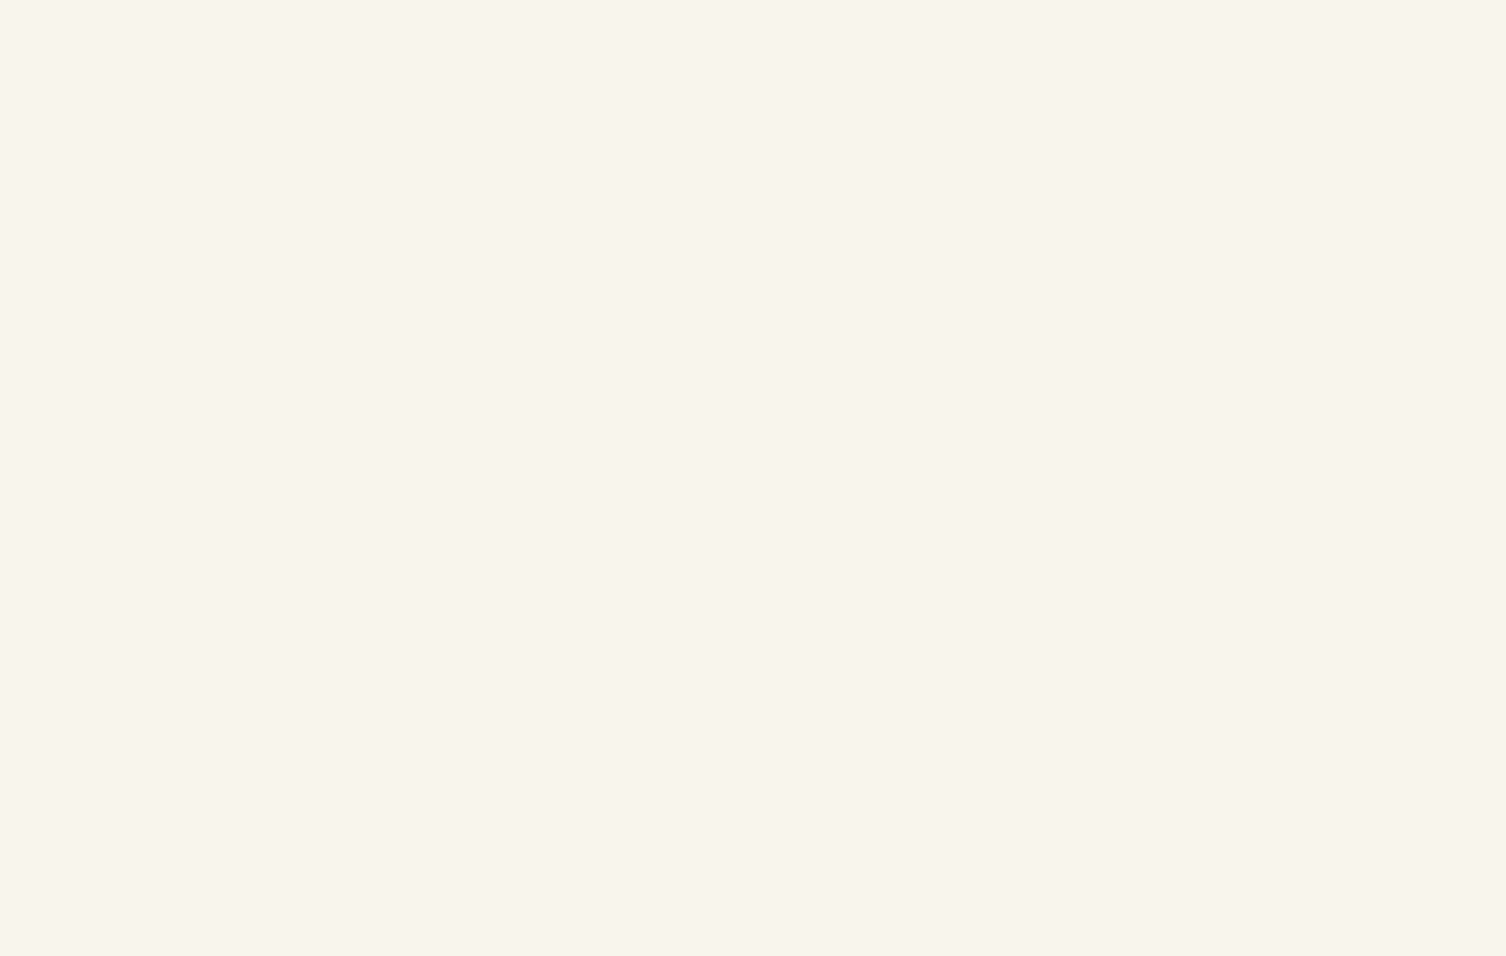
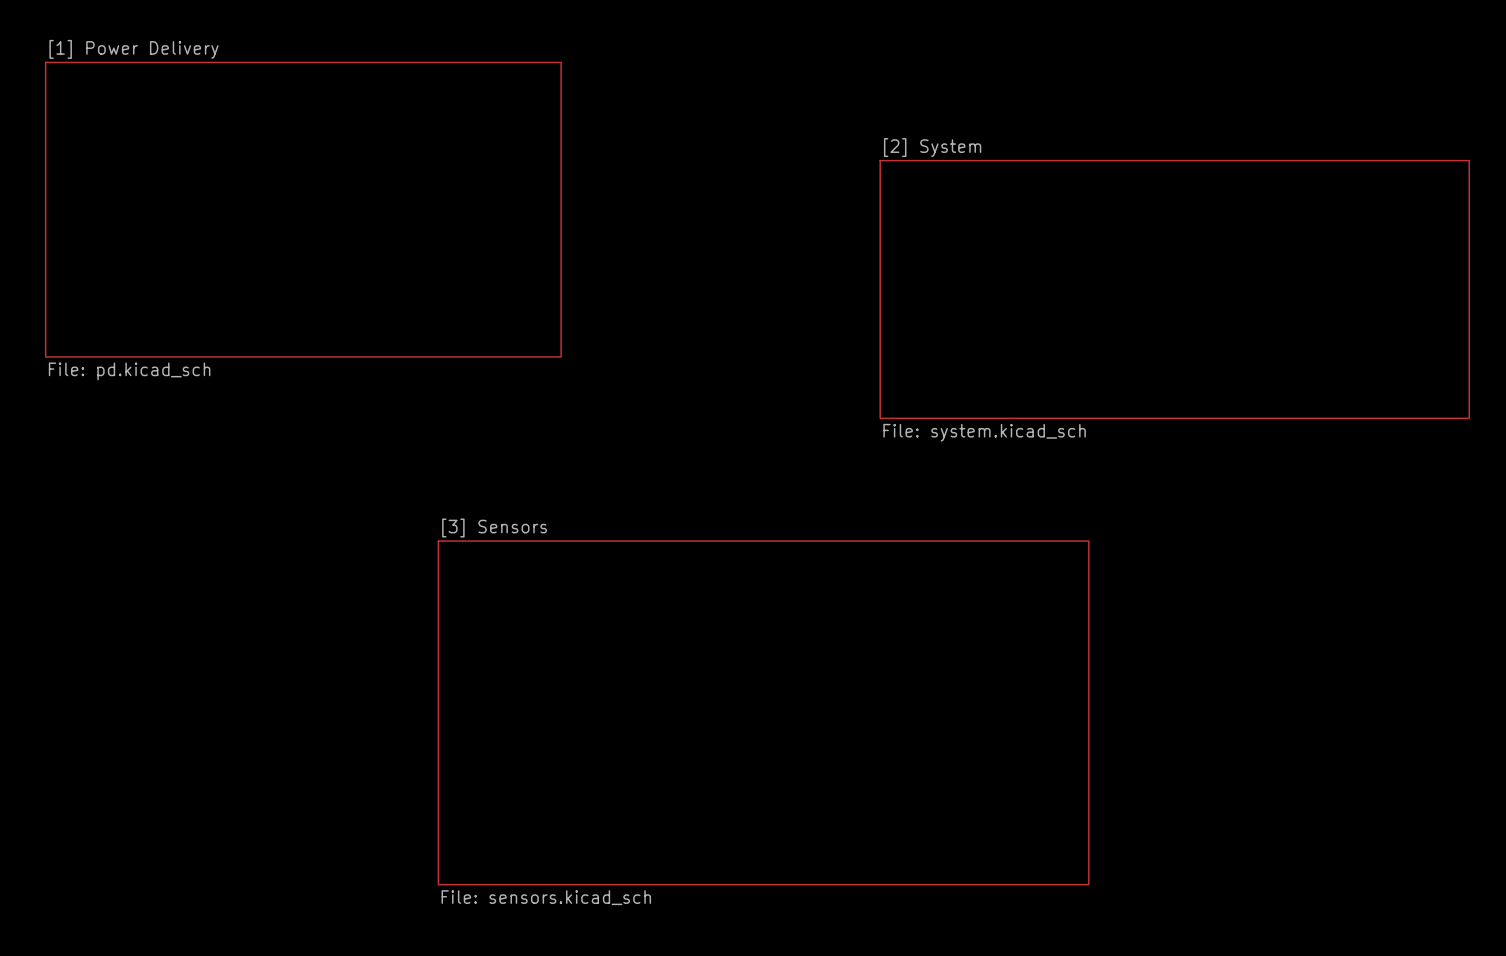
sheet [1] Power Delivery: none -> File: pd.kicad_sch (303, 209)
sheet [2] System: none -> File: system.kicad_sch (1174, 289)
sheet [3] Sensors: none -> File: sensors.kicad_sch (763, 712)

